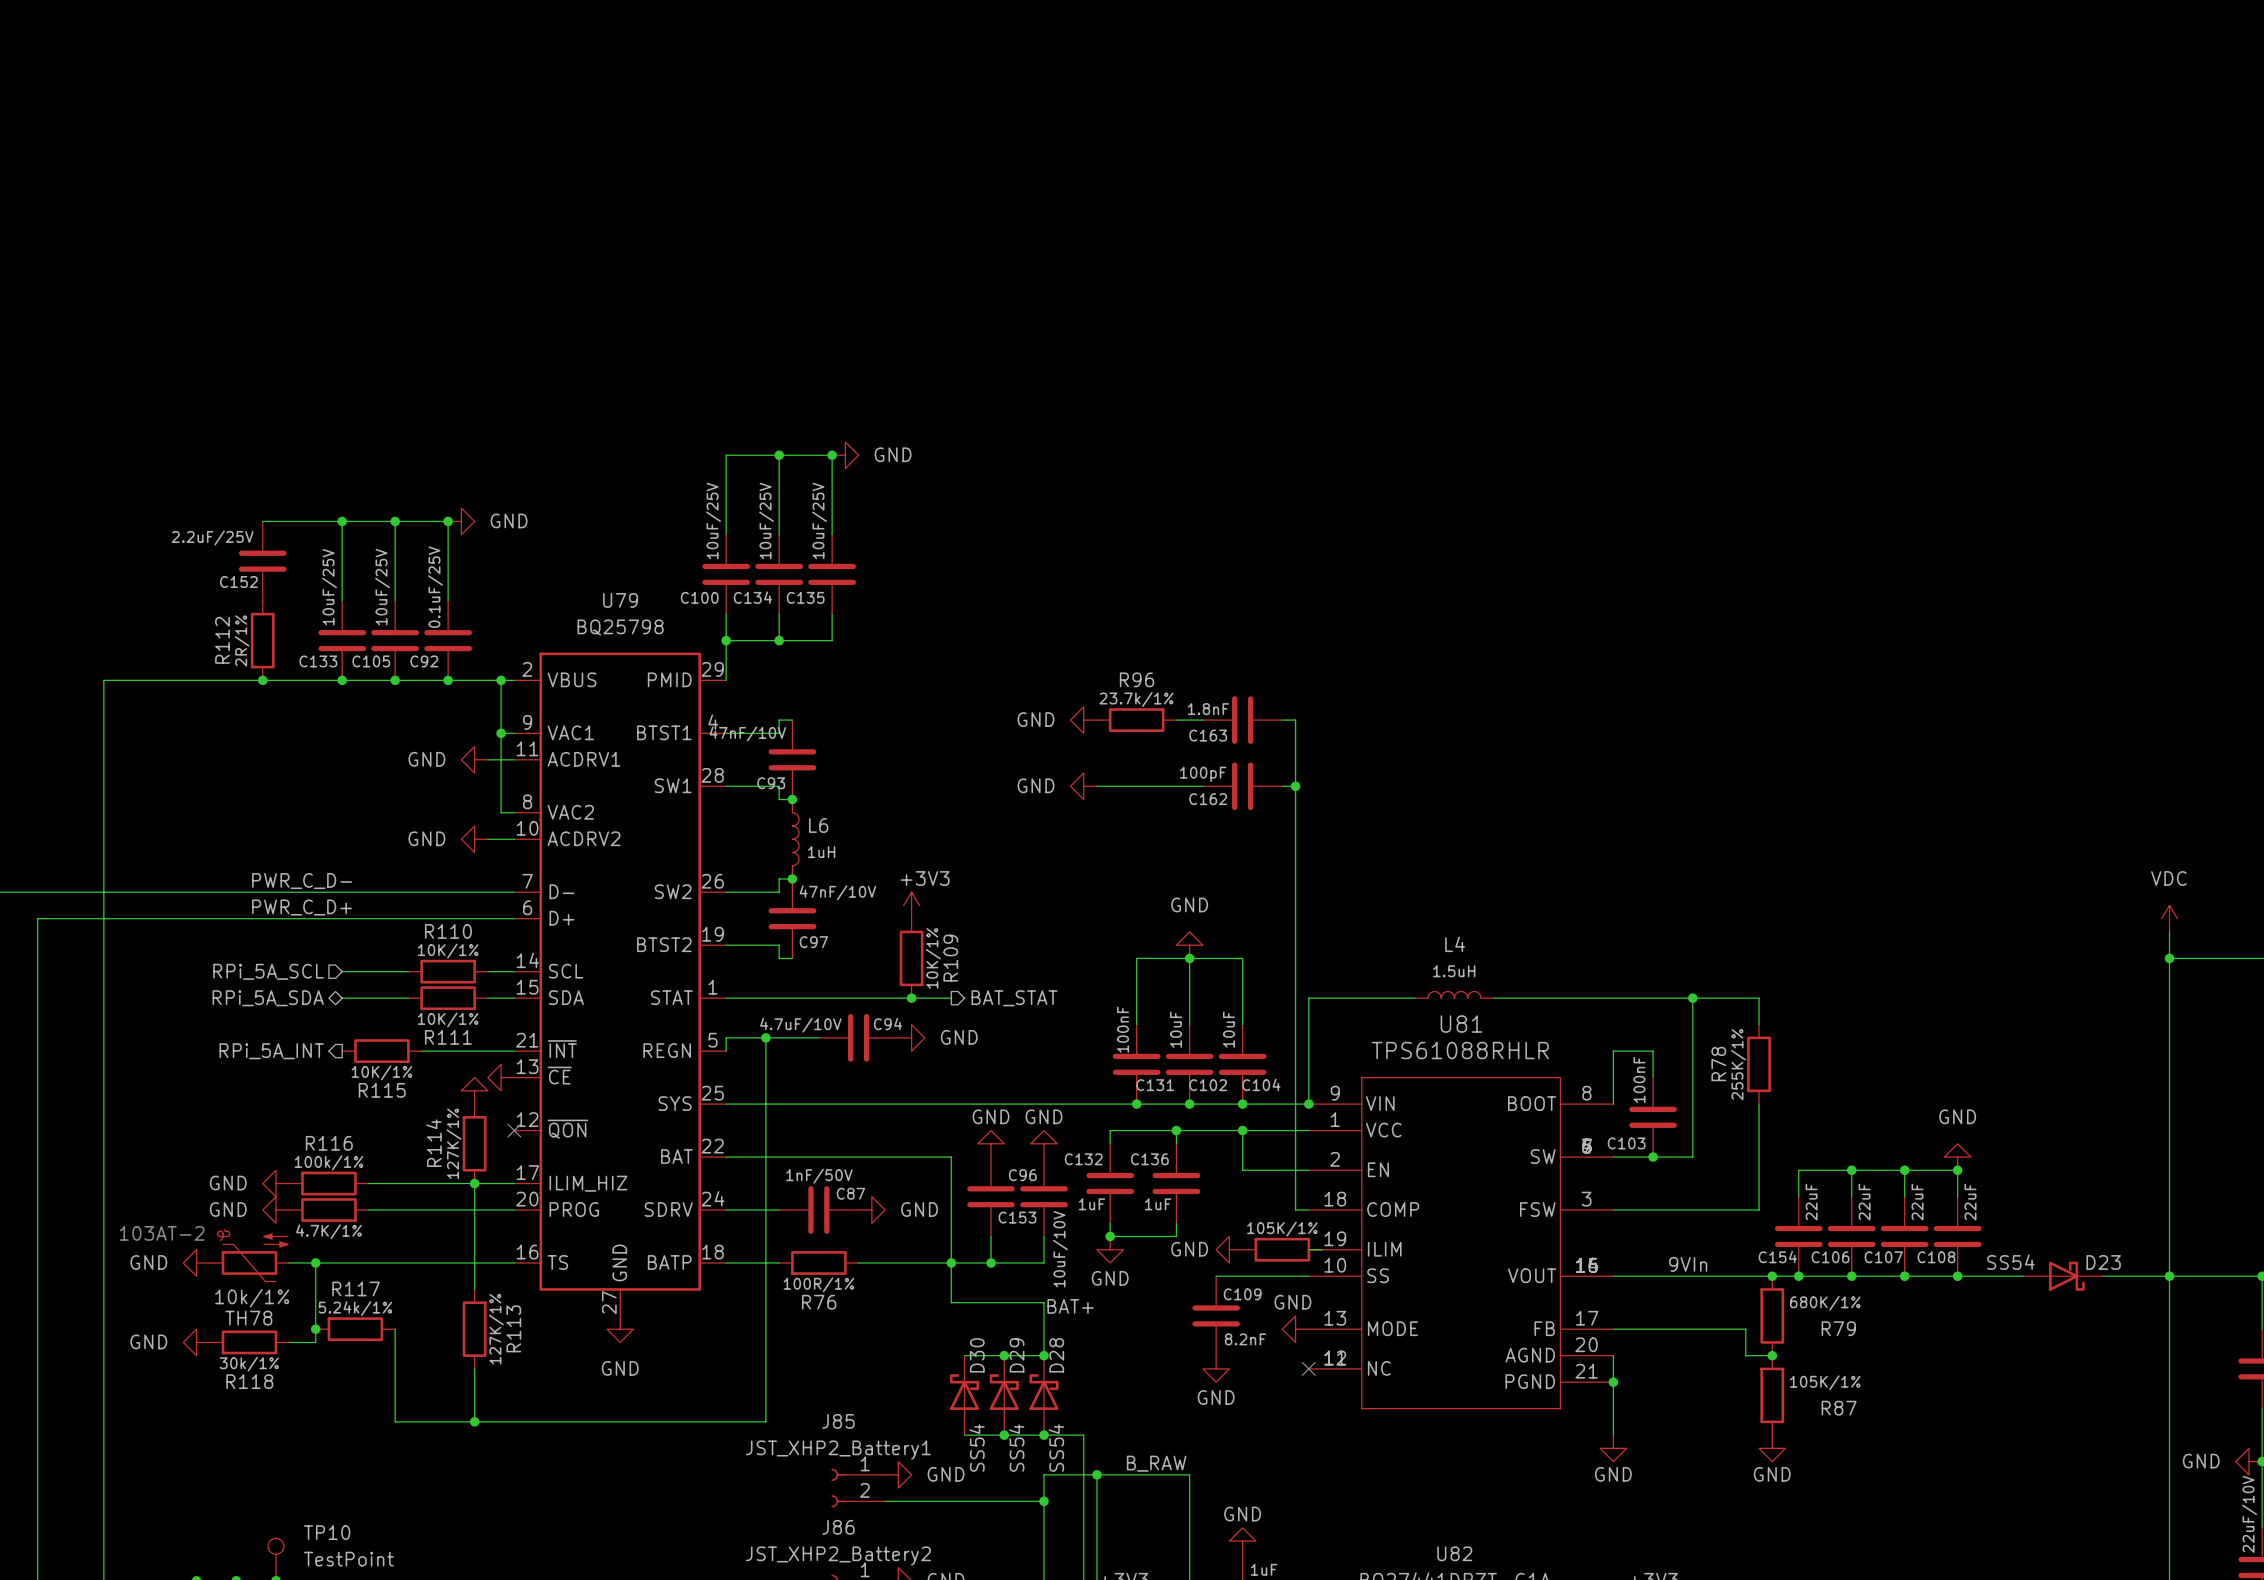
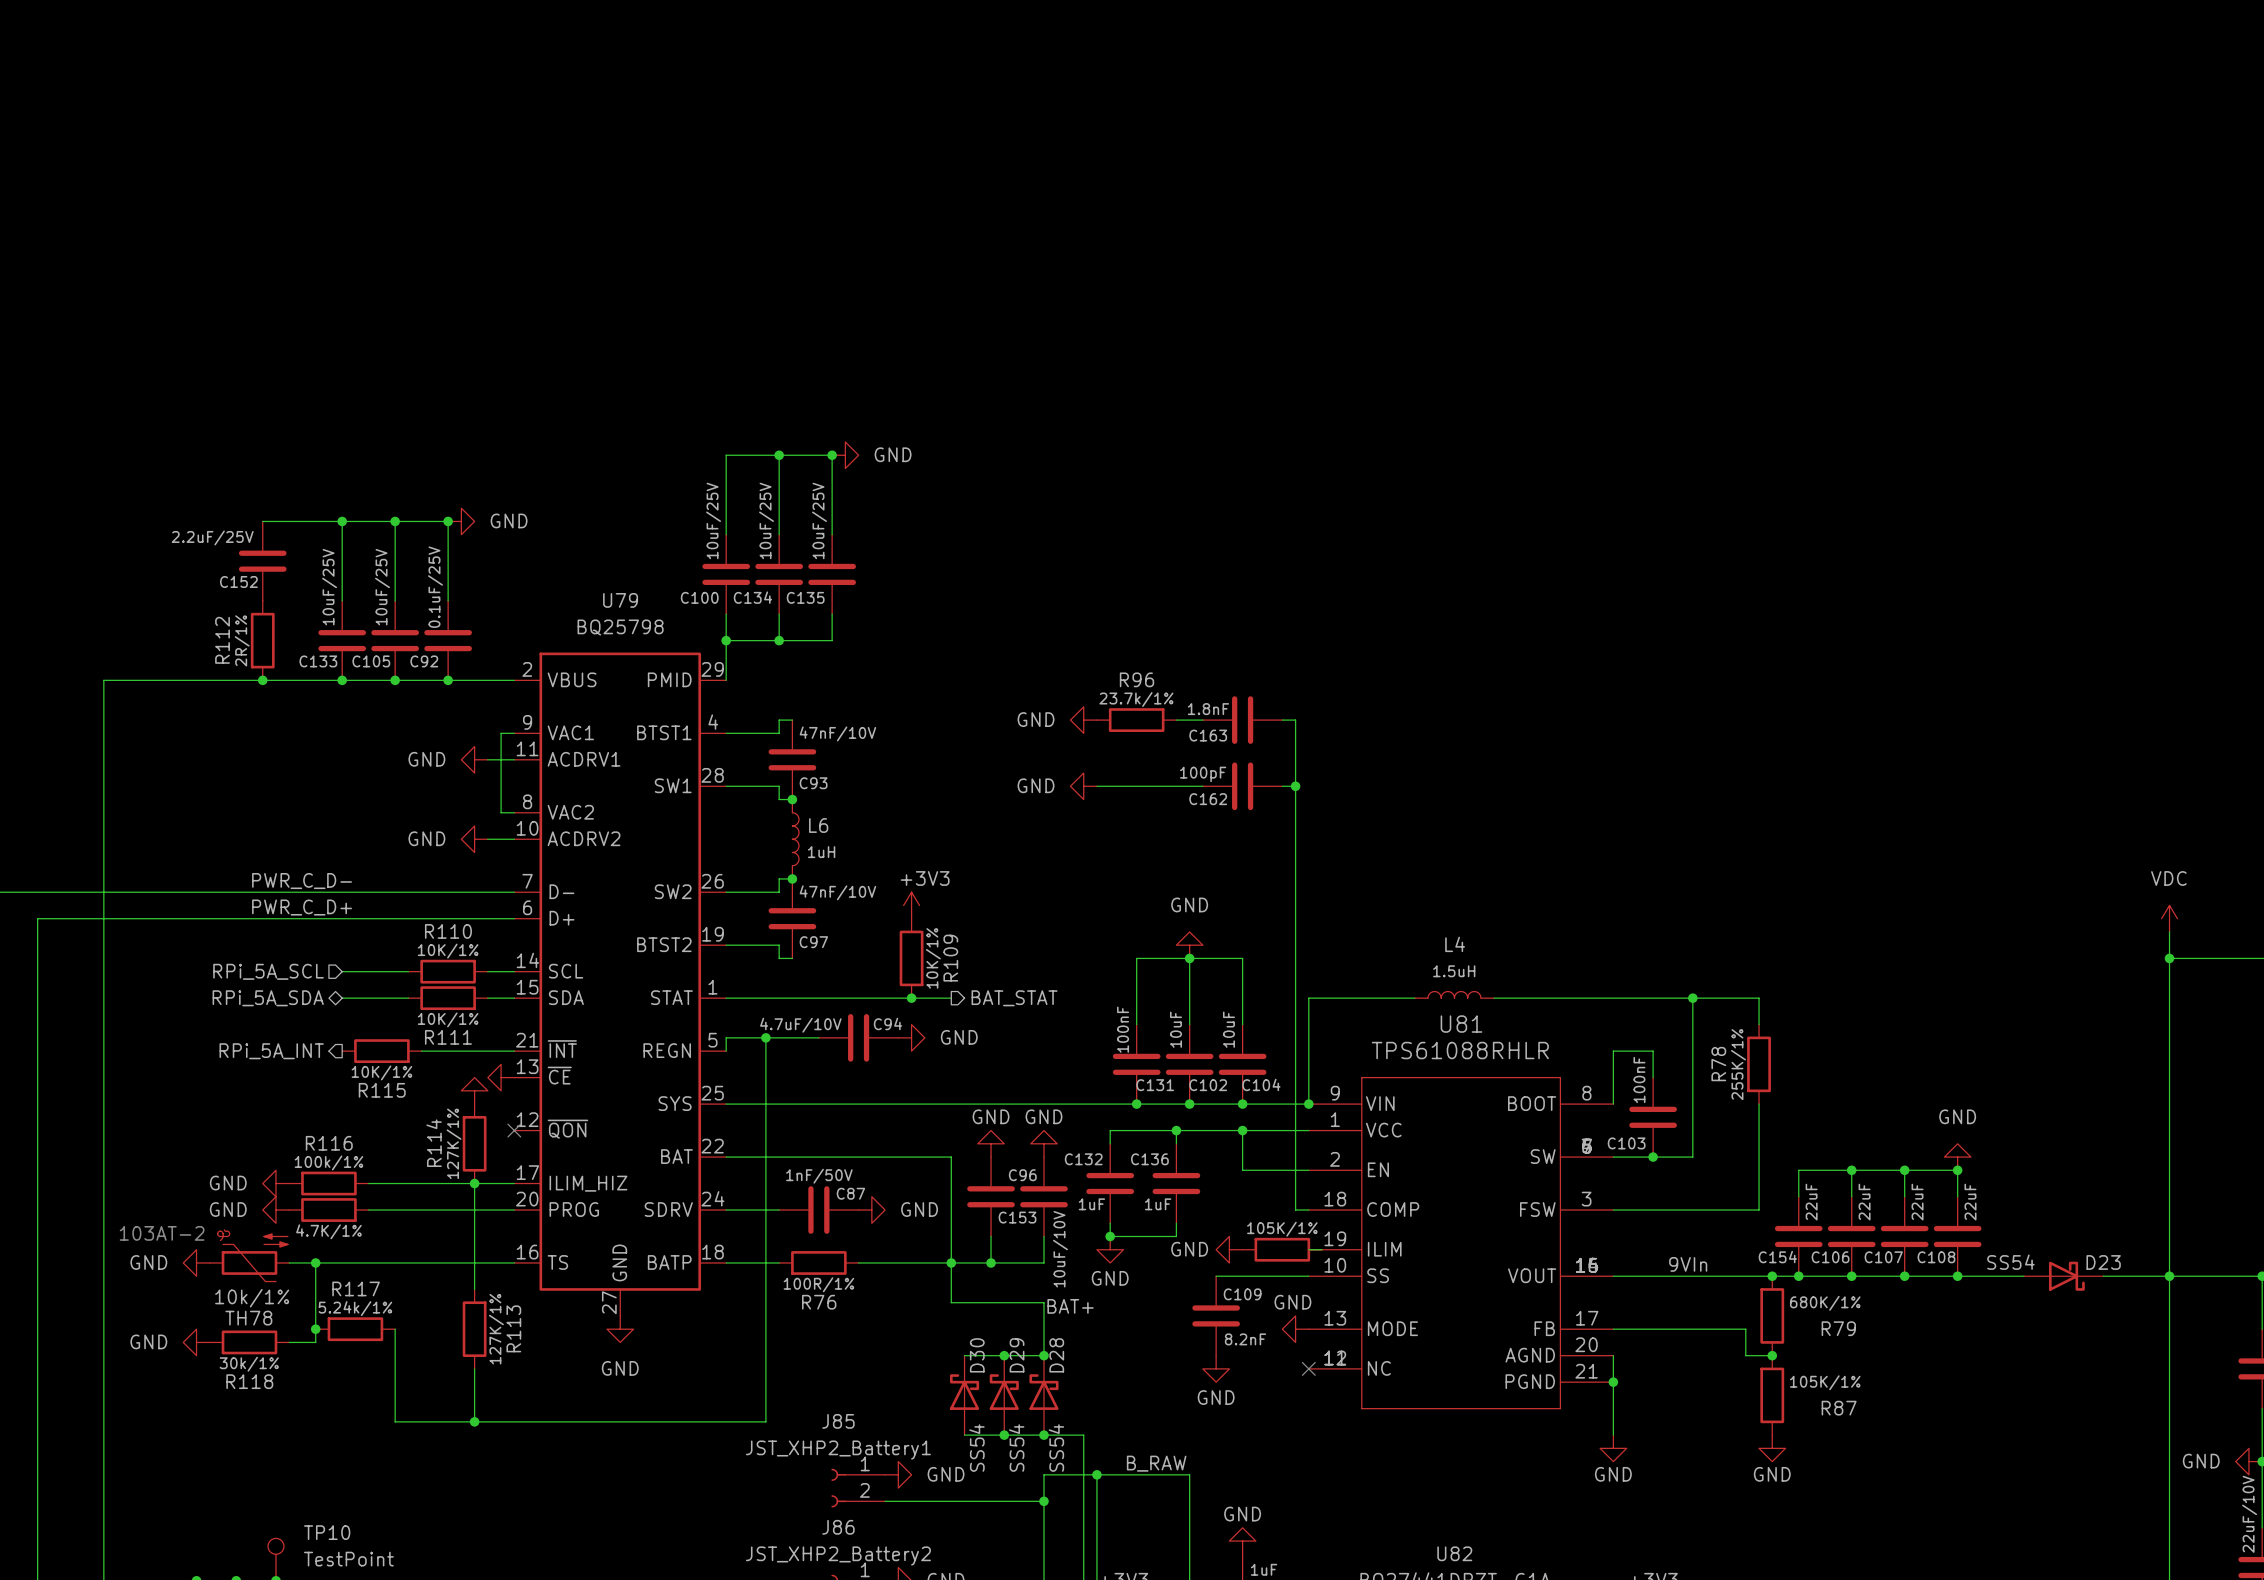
wire: (501, 680) (501, 733) -> none
junction: (501, 680) -> none
junction: (501, 733) -> none
C93 value position: 47nF/10V (747, 733) -> 47nF/10V (837, 733)
C93 name position: C93 (771, 783) -> C93 (813, 783)

